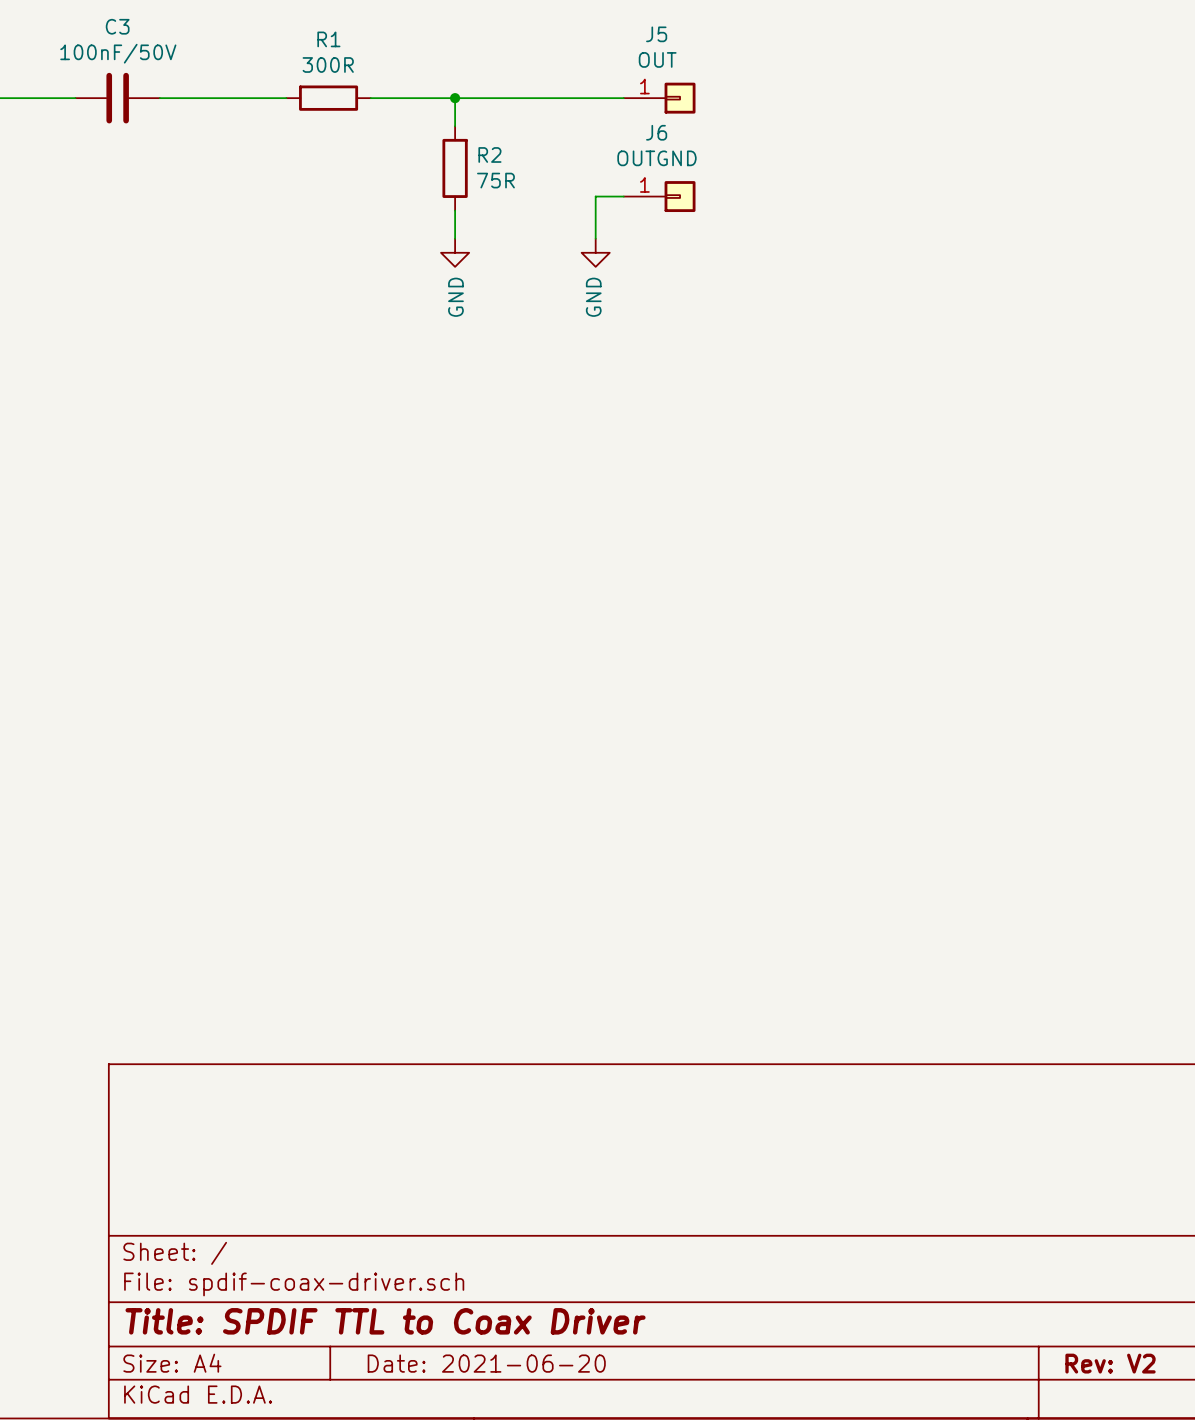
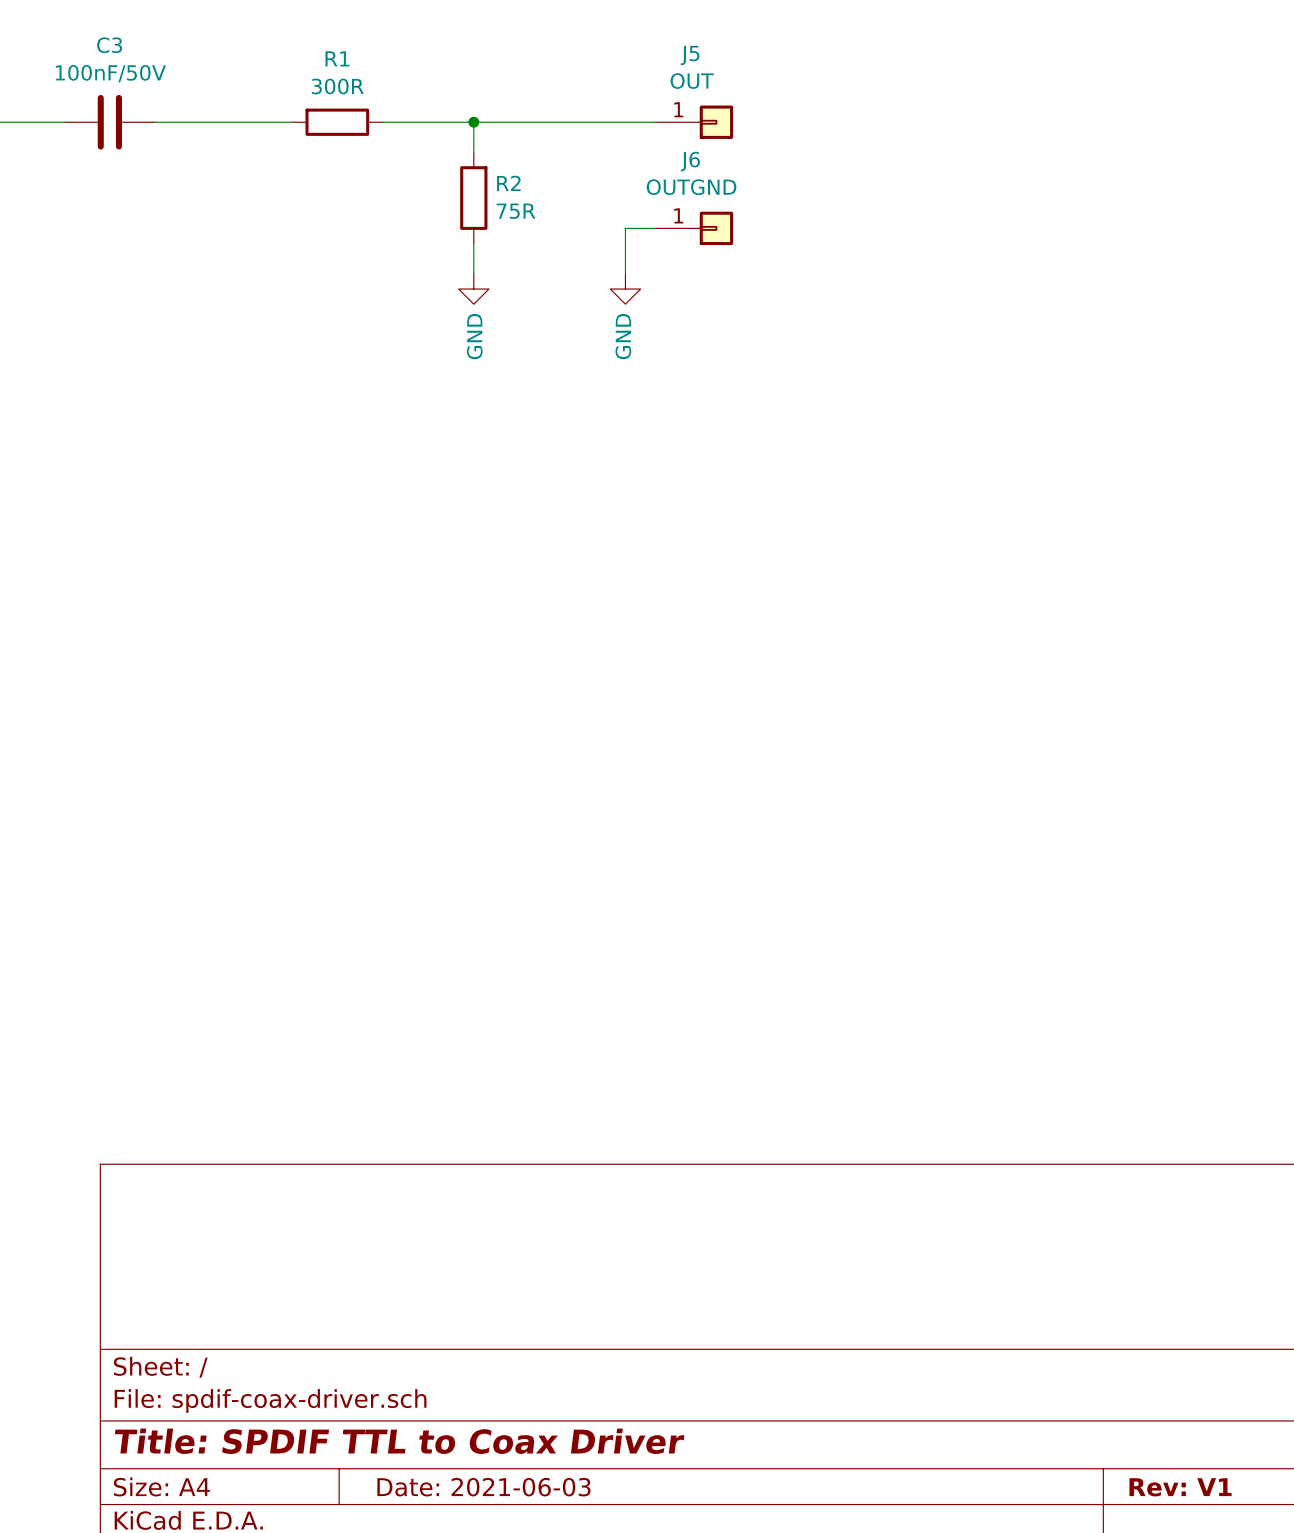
title block: Date: 2021-06-20 (486, 1363) -> Date: 2021-06-03 (483, 1487)
title block: Rev: V2 (1110, 1363) -> Rev: V1 (1180, 1487)

